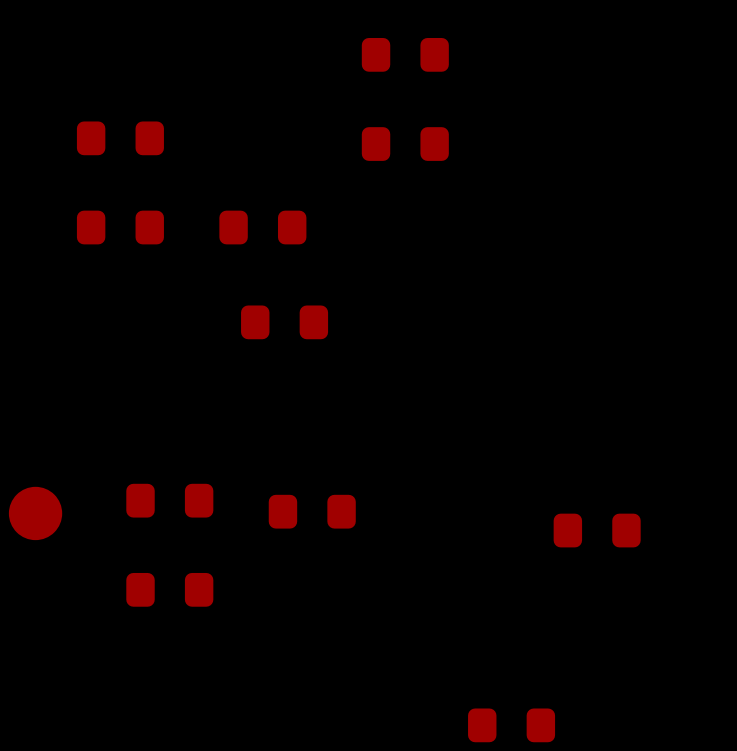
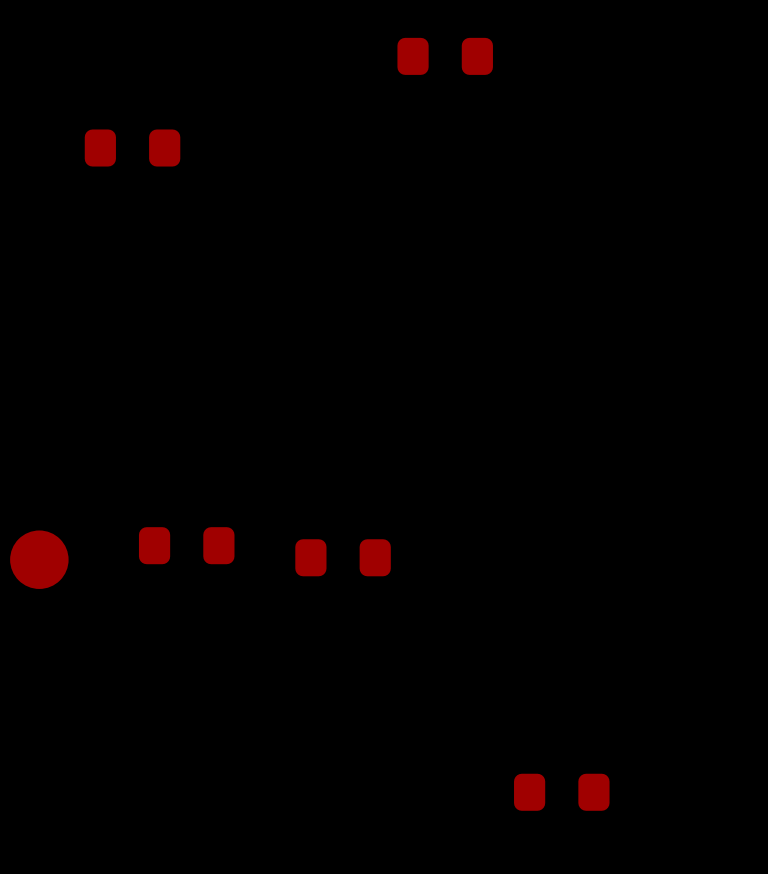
part: (405, 144) -> none
part: (120, 227) -> none
part: (262, 227) -> none
part: (284, 322) -> none
part: (597, 530) -> none
part: (169, 589) -> none

